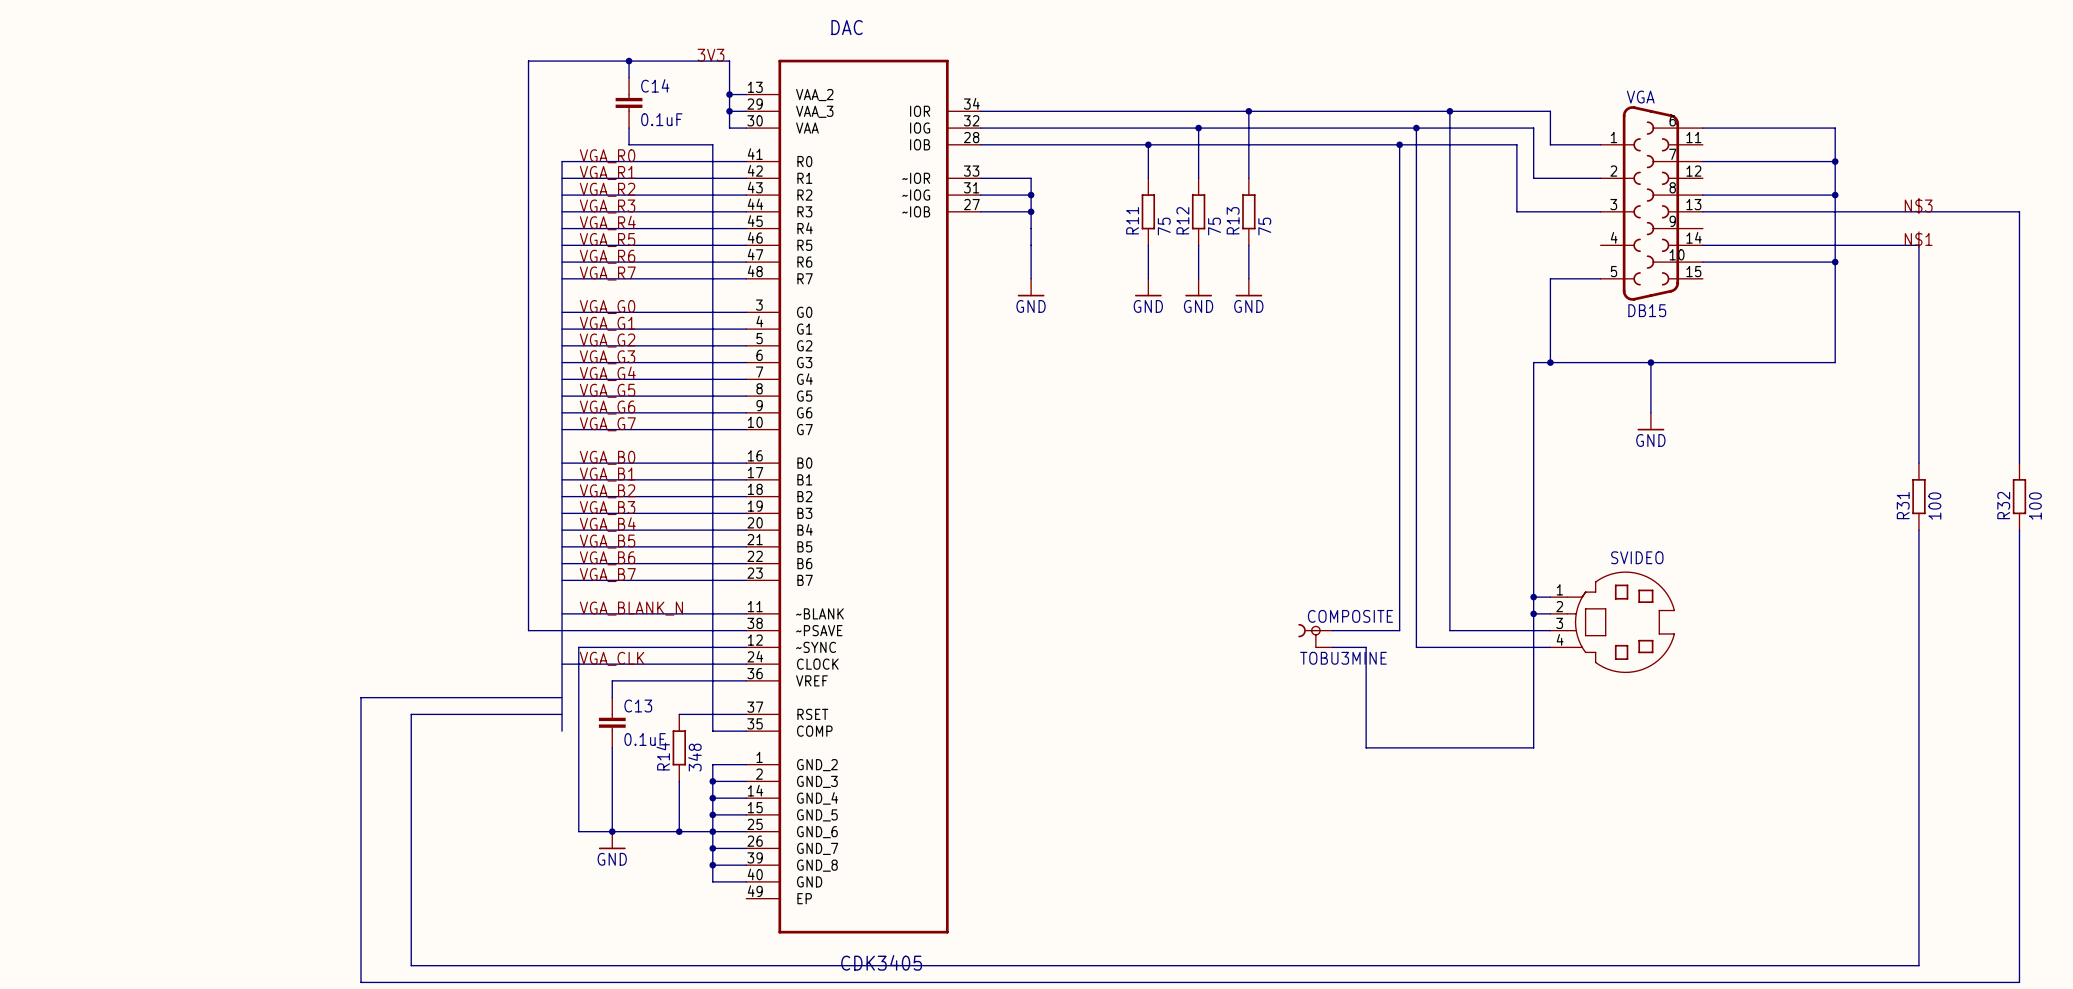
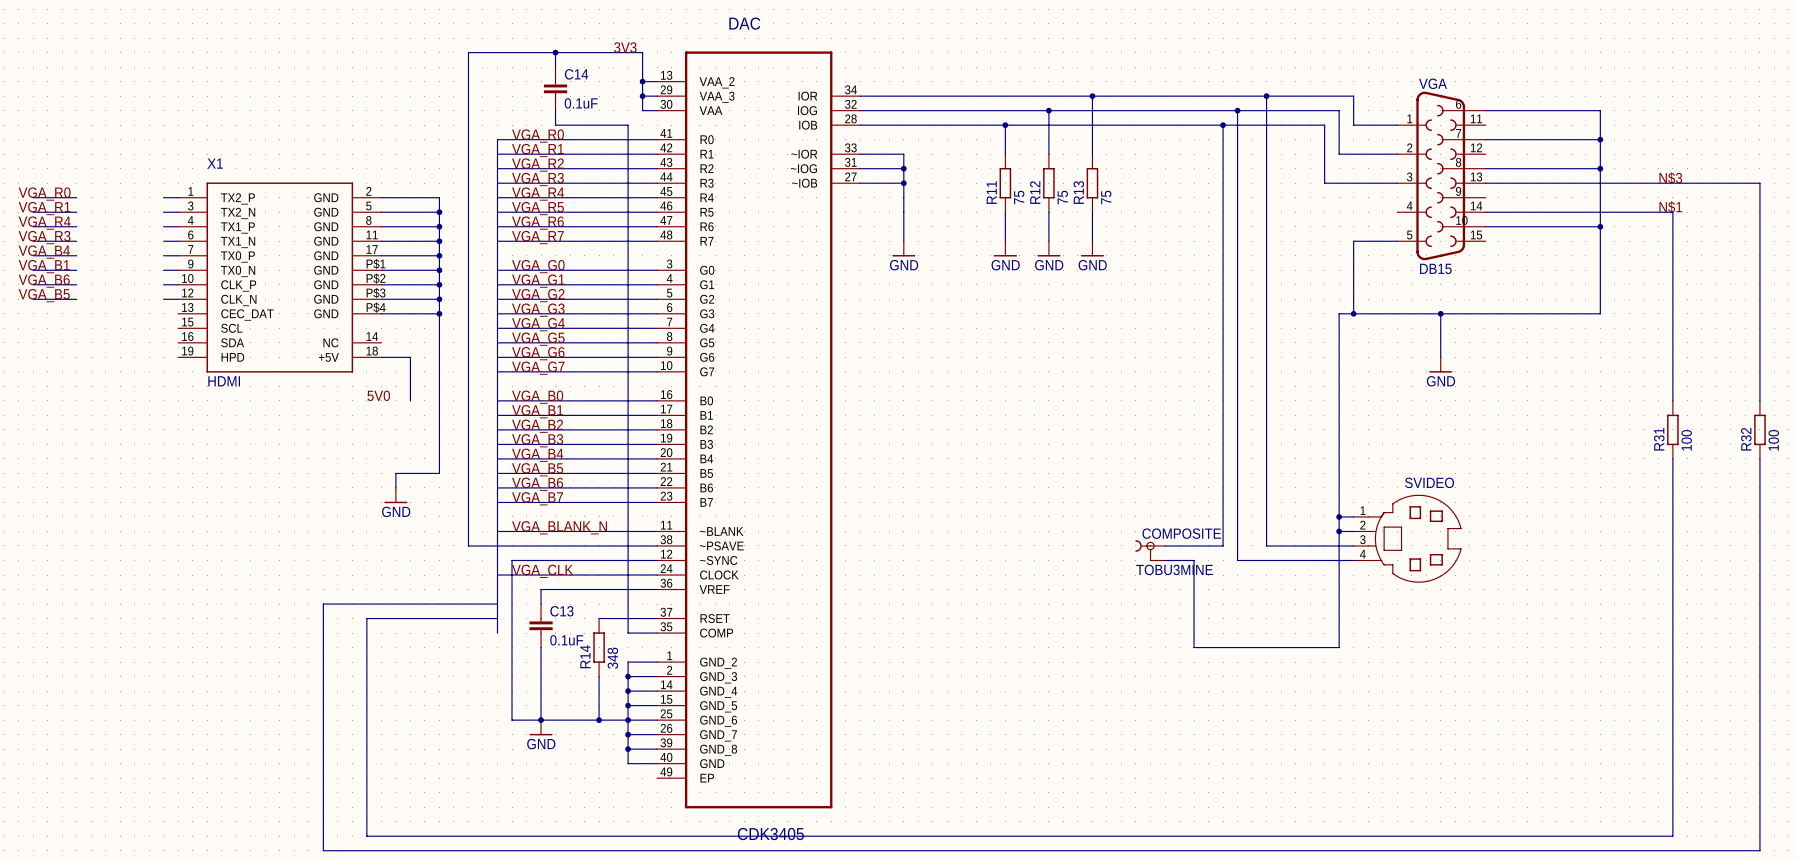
label: none -> VGA_R0 (44, 194)
wire: none -> (33, 197) (76, 197)
wire: none -> (163, 197) (178, 197)
wire: none -> (381, 197) (439, 197) (439, 473) (395, 473) (395, 487)
label: none -> VGA_R1 (44, 208)
wire: none -> (33, 212) (76, 212)
wire: none -> (163, 212) (178, 212)
wire: none -> (381, 212) (439, 212)
junction: none -> (439, 212)
label: none -> VGA_R4 (44, 223)
wire: none -> (33, 226) (76, 226)
wire: none -> (163, 226) (178, 226)
wire: none -> (381, 226) (439, 226)
junction: none -> (439, 226)
label: none -> VGA_R3 (44, 237)
wire: none -> (33, 241) (76, 241)
wire: none -> (163, 241) (178, 241)
wire: none -> (381, 241) (439, 241)
junction: none -> (439, 241)
label: none -> VGA_B4 (44, 252)
wire: none -> (33, 255) (76, 255)
wire: none -> (163, 255) (178, 255)
wire: none -> (381, 255) (439, 255)
junction: none -> (439, 255)
label: none -> VGA_B1 (44, 266)
wire: none -> (33, 270) (76, 270)
wire: none -> (163, 270) (178, 270)
wire: none -> (381, 270) (439, 270)
junction: none -> (439, 270)
X1: none -> HDMI (279, 277)
label: none -> VGA_B6 (44, 281)
wire: none -> (33, 284) (76, 284)
wire: none -> (163, 284) (178, 284)
wire: none -> (381, 284) (439, 284)
junction: none -> (439, 284)
label: none -> VGA_B5 (44, 295)
wire: none -> (33, 299) (76, 299)
wire: none -> (163, 299) (178, 299)
wire: none -> (381, 299) (439, 299)
junction: none -> (439, 299)
wire: none -> (381, 313) (439, 313)
junction: none -> (439, 313)
wire: none -> (381, 357) (410, 357) (410, 400)
label: none -> 5V0 (378, 395)
power symbol: none -> GND (395, 495)

